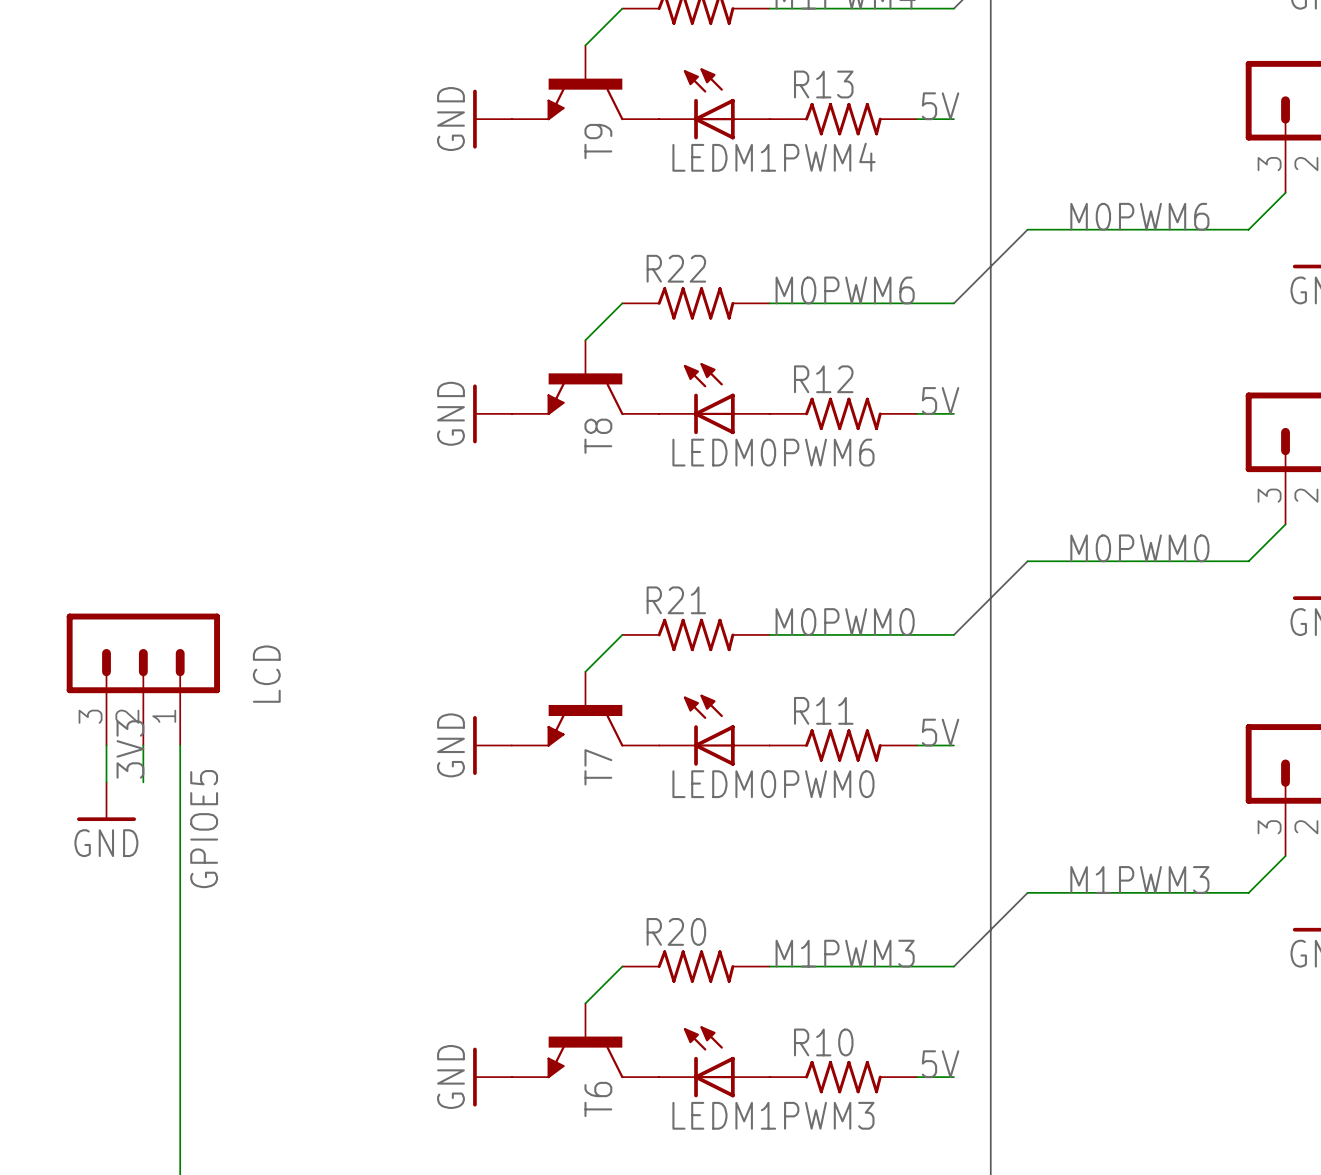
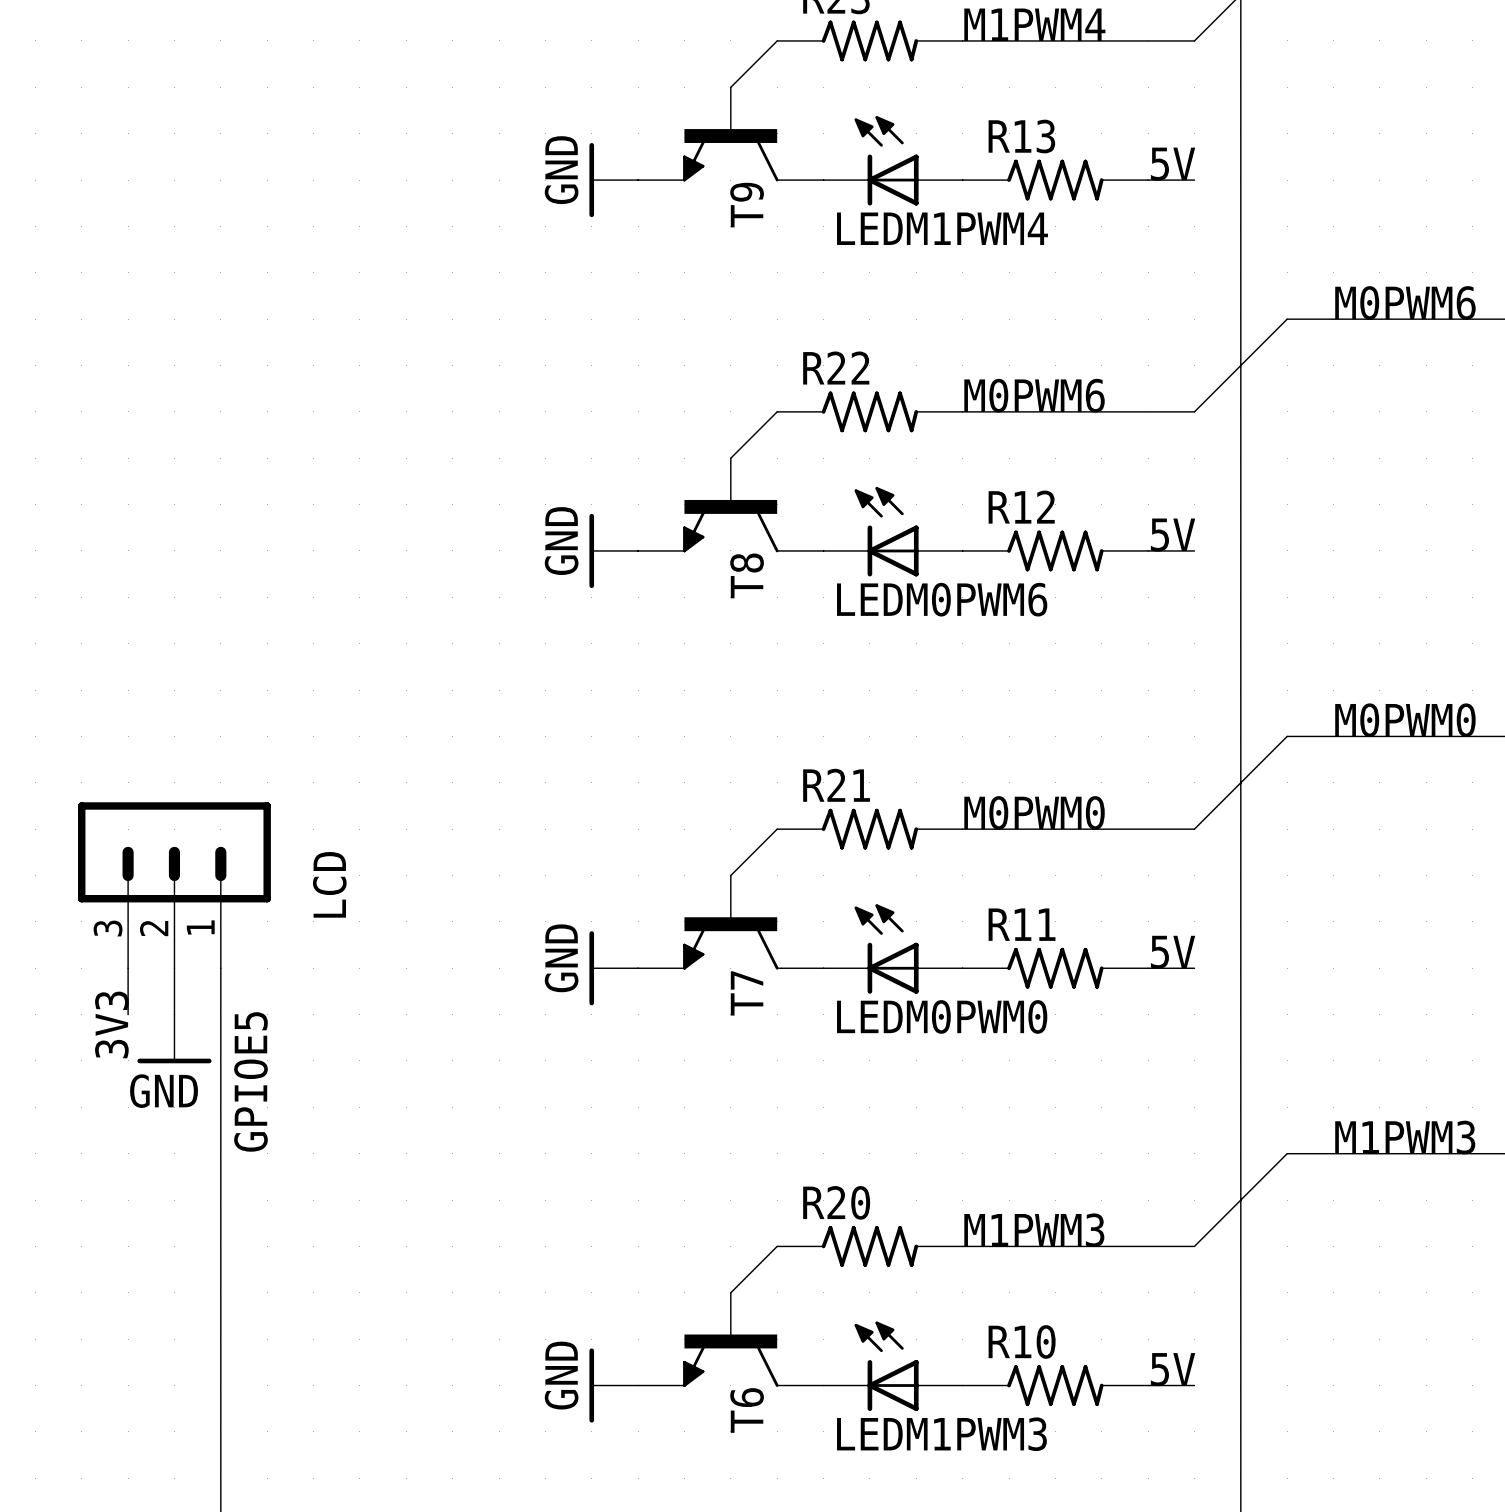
label position: 3V3 (130, 749) -> 3V3 (111, 1024)
power symbol position: GND (106, 801) -> GND (174, 1038)

